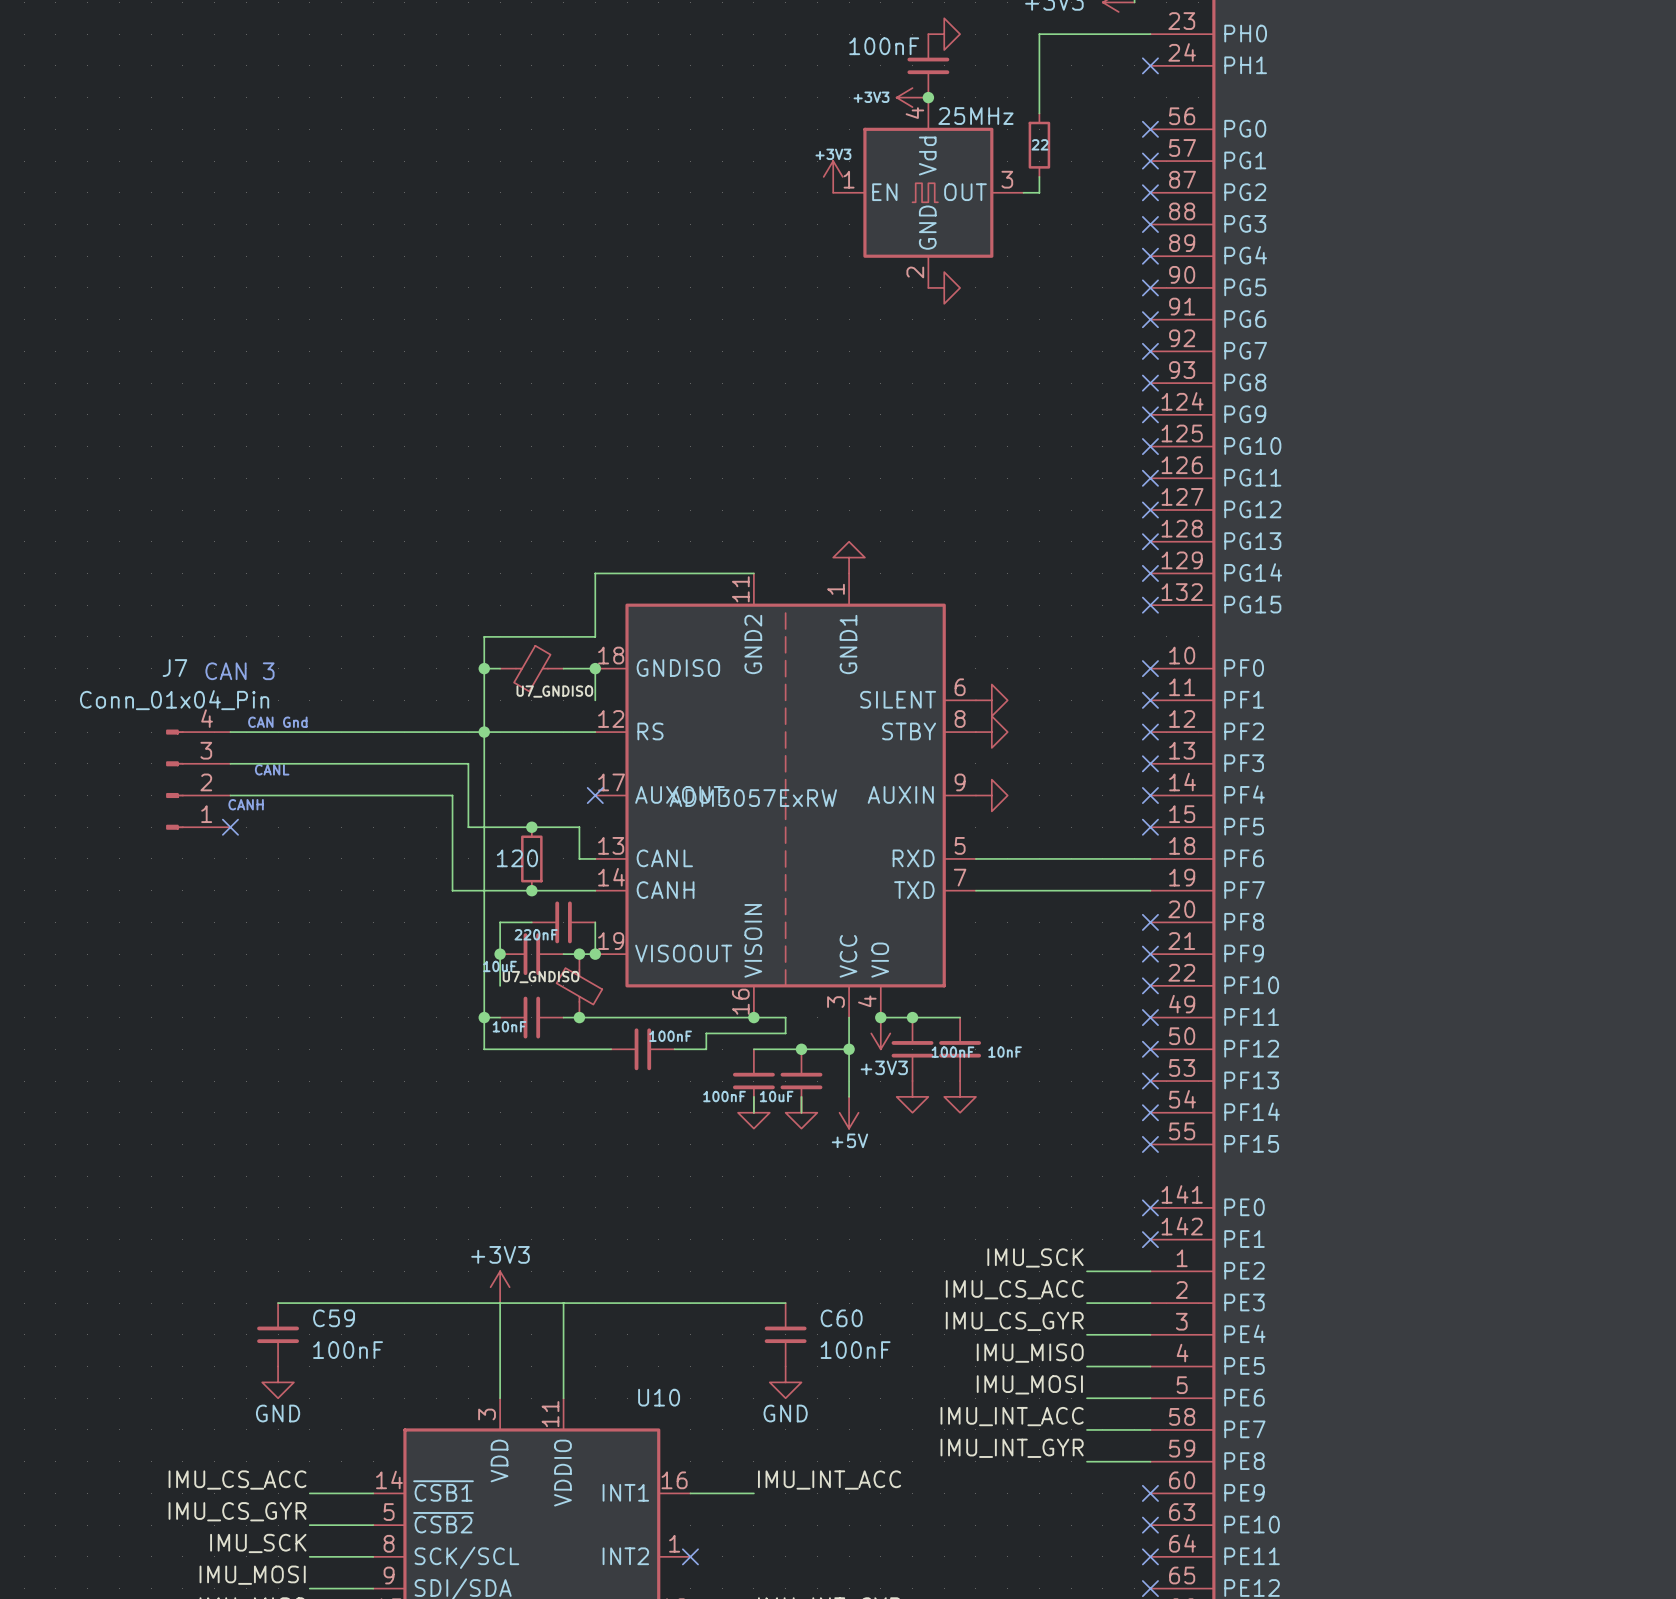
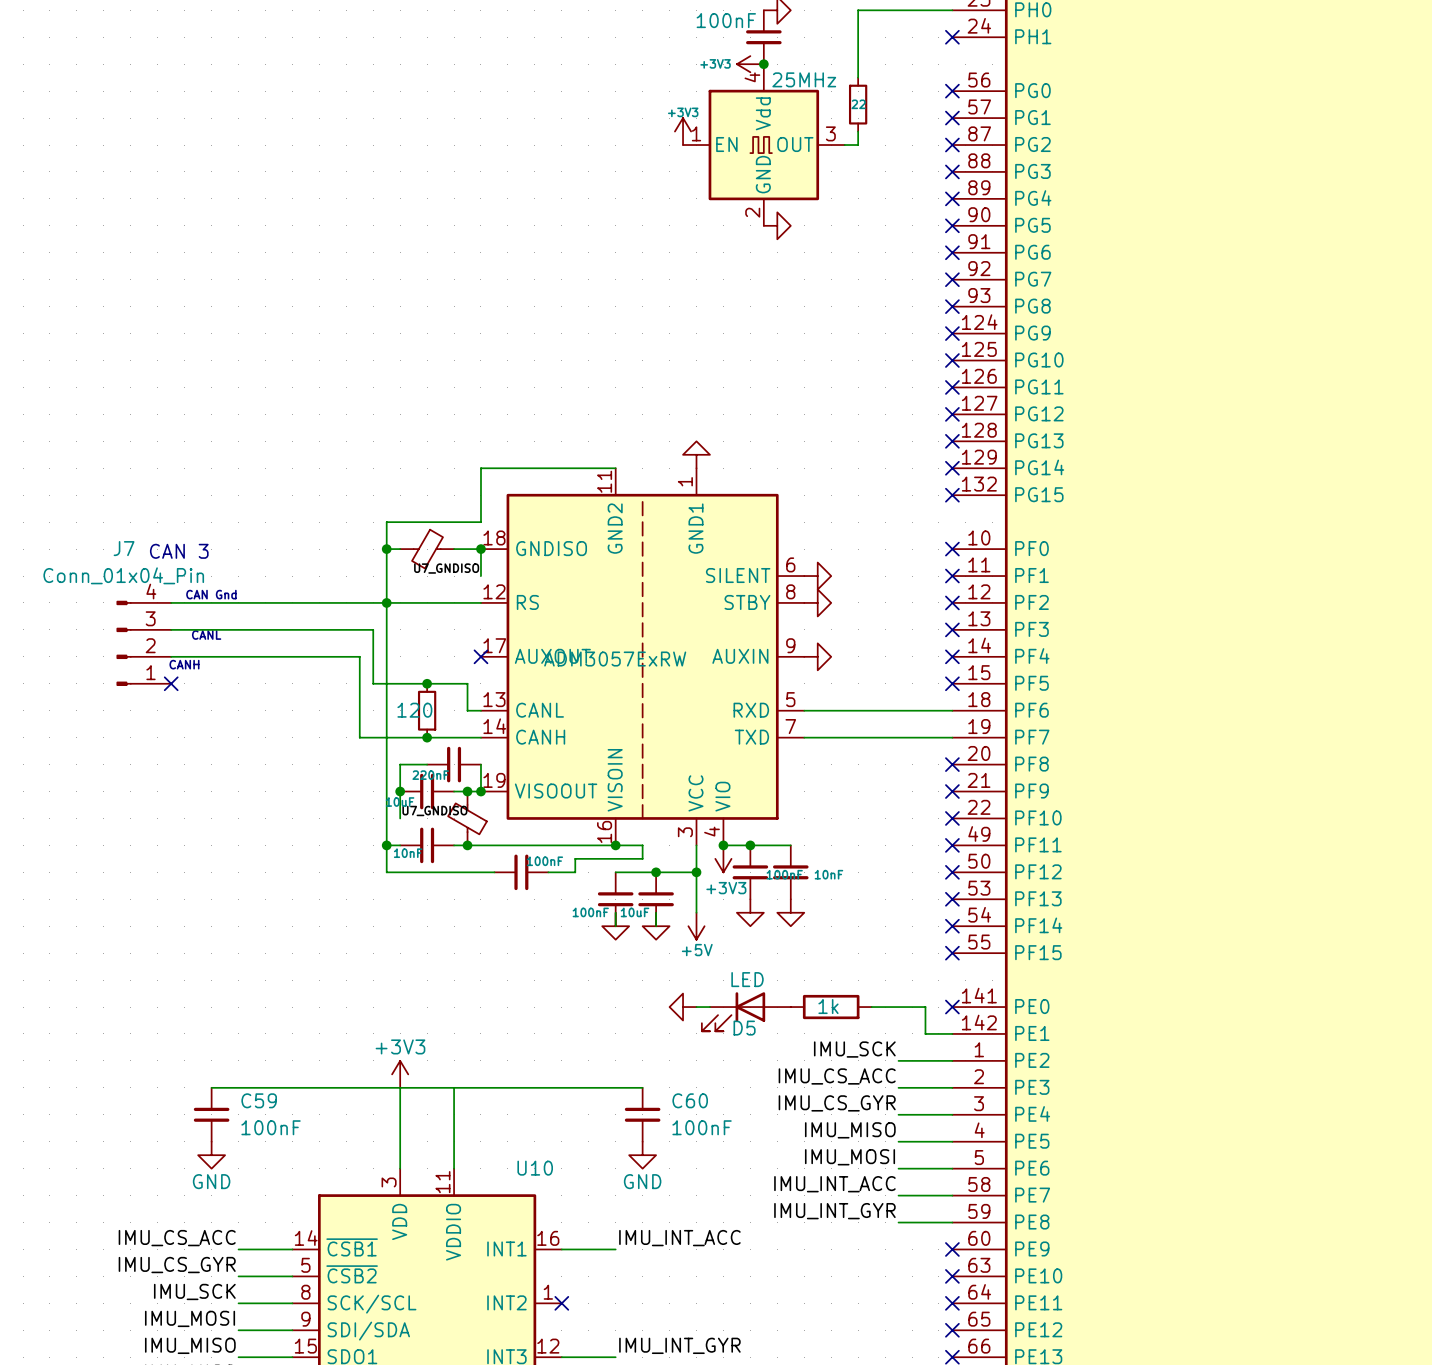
power symbol: none -> (683, 1007)
wire: none -> (696, 1007) (709, 1007)
part: none -> 1k (831, 1007)
wire: none -> (871, 1007) (925, 1007) (925, 1033) (952, 1033)
D5: none -> LED (746, 1011)
no-connect mark: (1150, 1239) -> none

